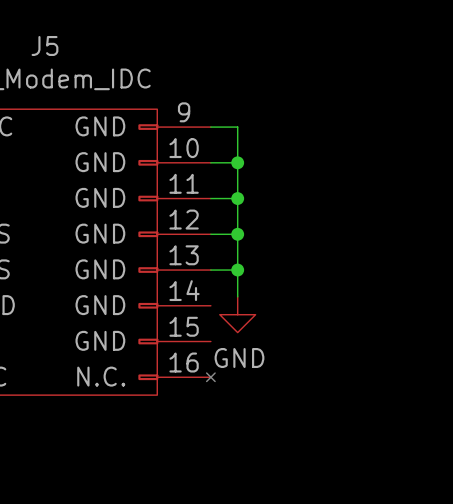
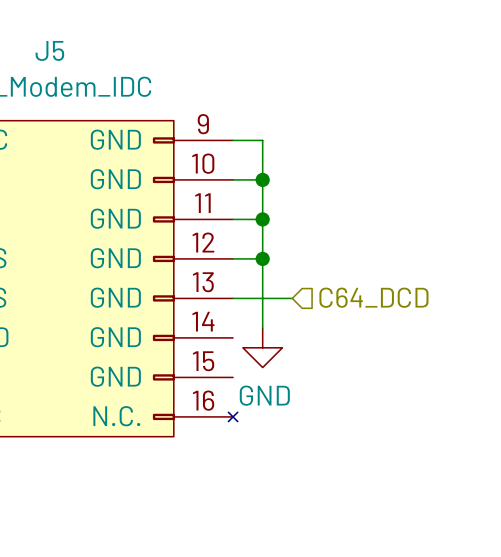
hierarchical label: none -> C64_DCD (373, 297)
wire: none -> (262, 298) (292, 298)
junction: (237, 270) -> none

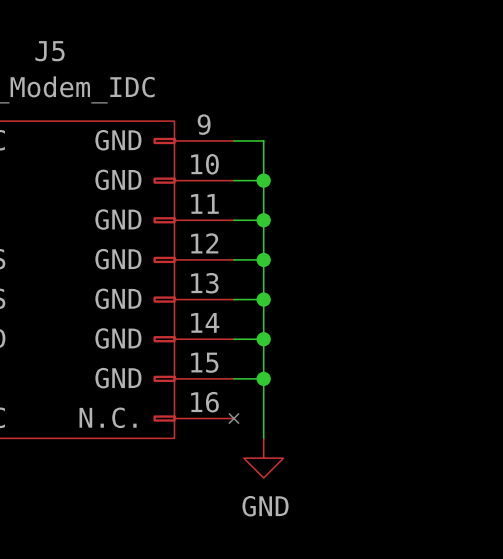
hierarchical label: C64_DCD (373, 297) -> none
wire: (262, 298) (292, 298) -> (233, 339) (263, 339)
junction: none -> (263, 299)
wire: none -> (263, 329) (263, 438)
junction: none -> (263, 339)
power symbol position: GND (262, 347) -> GND (263, 458)
wire: none -> (233, 378) (263, 378)
junction: none -> (263, 378)

